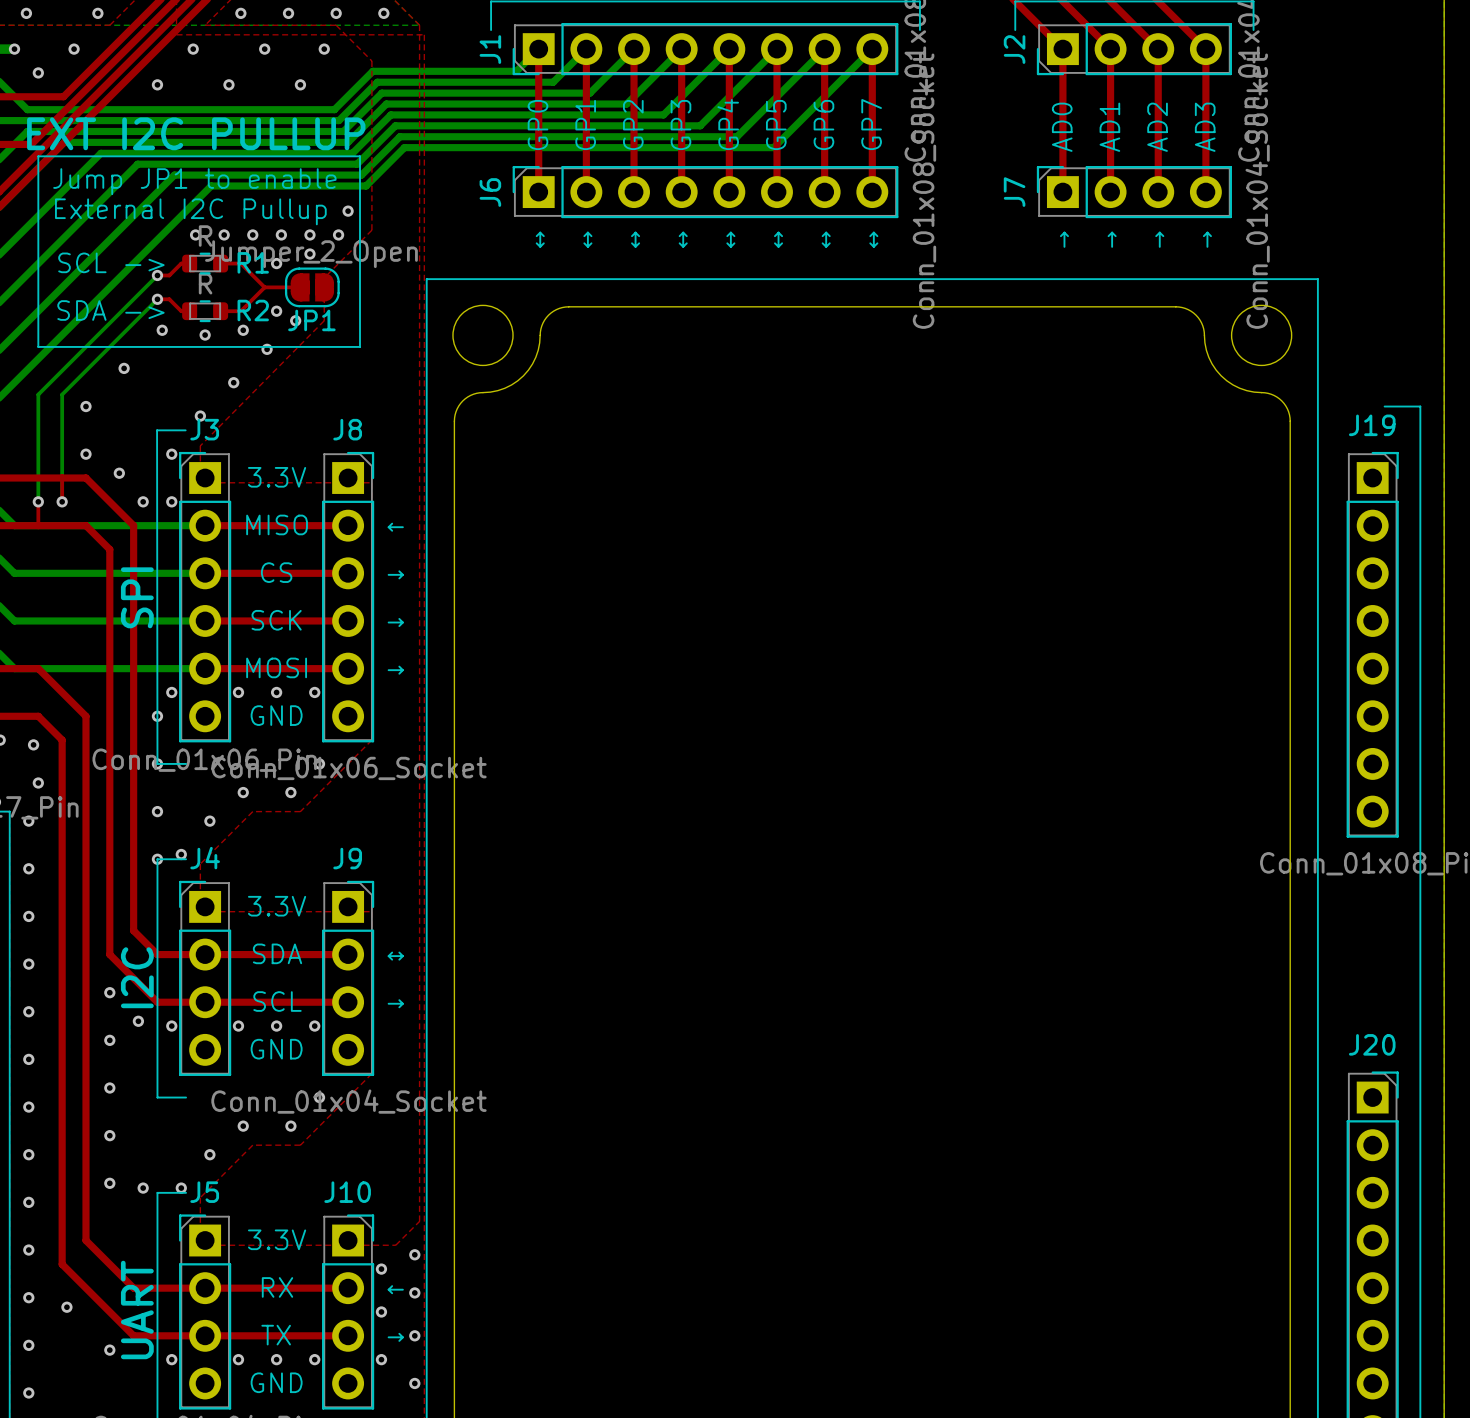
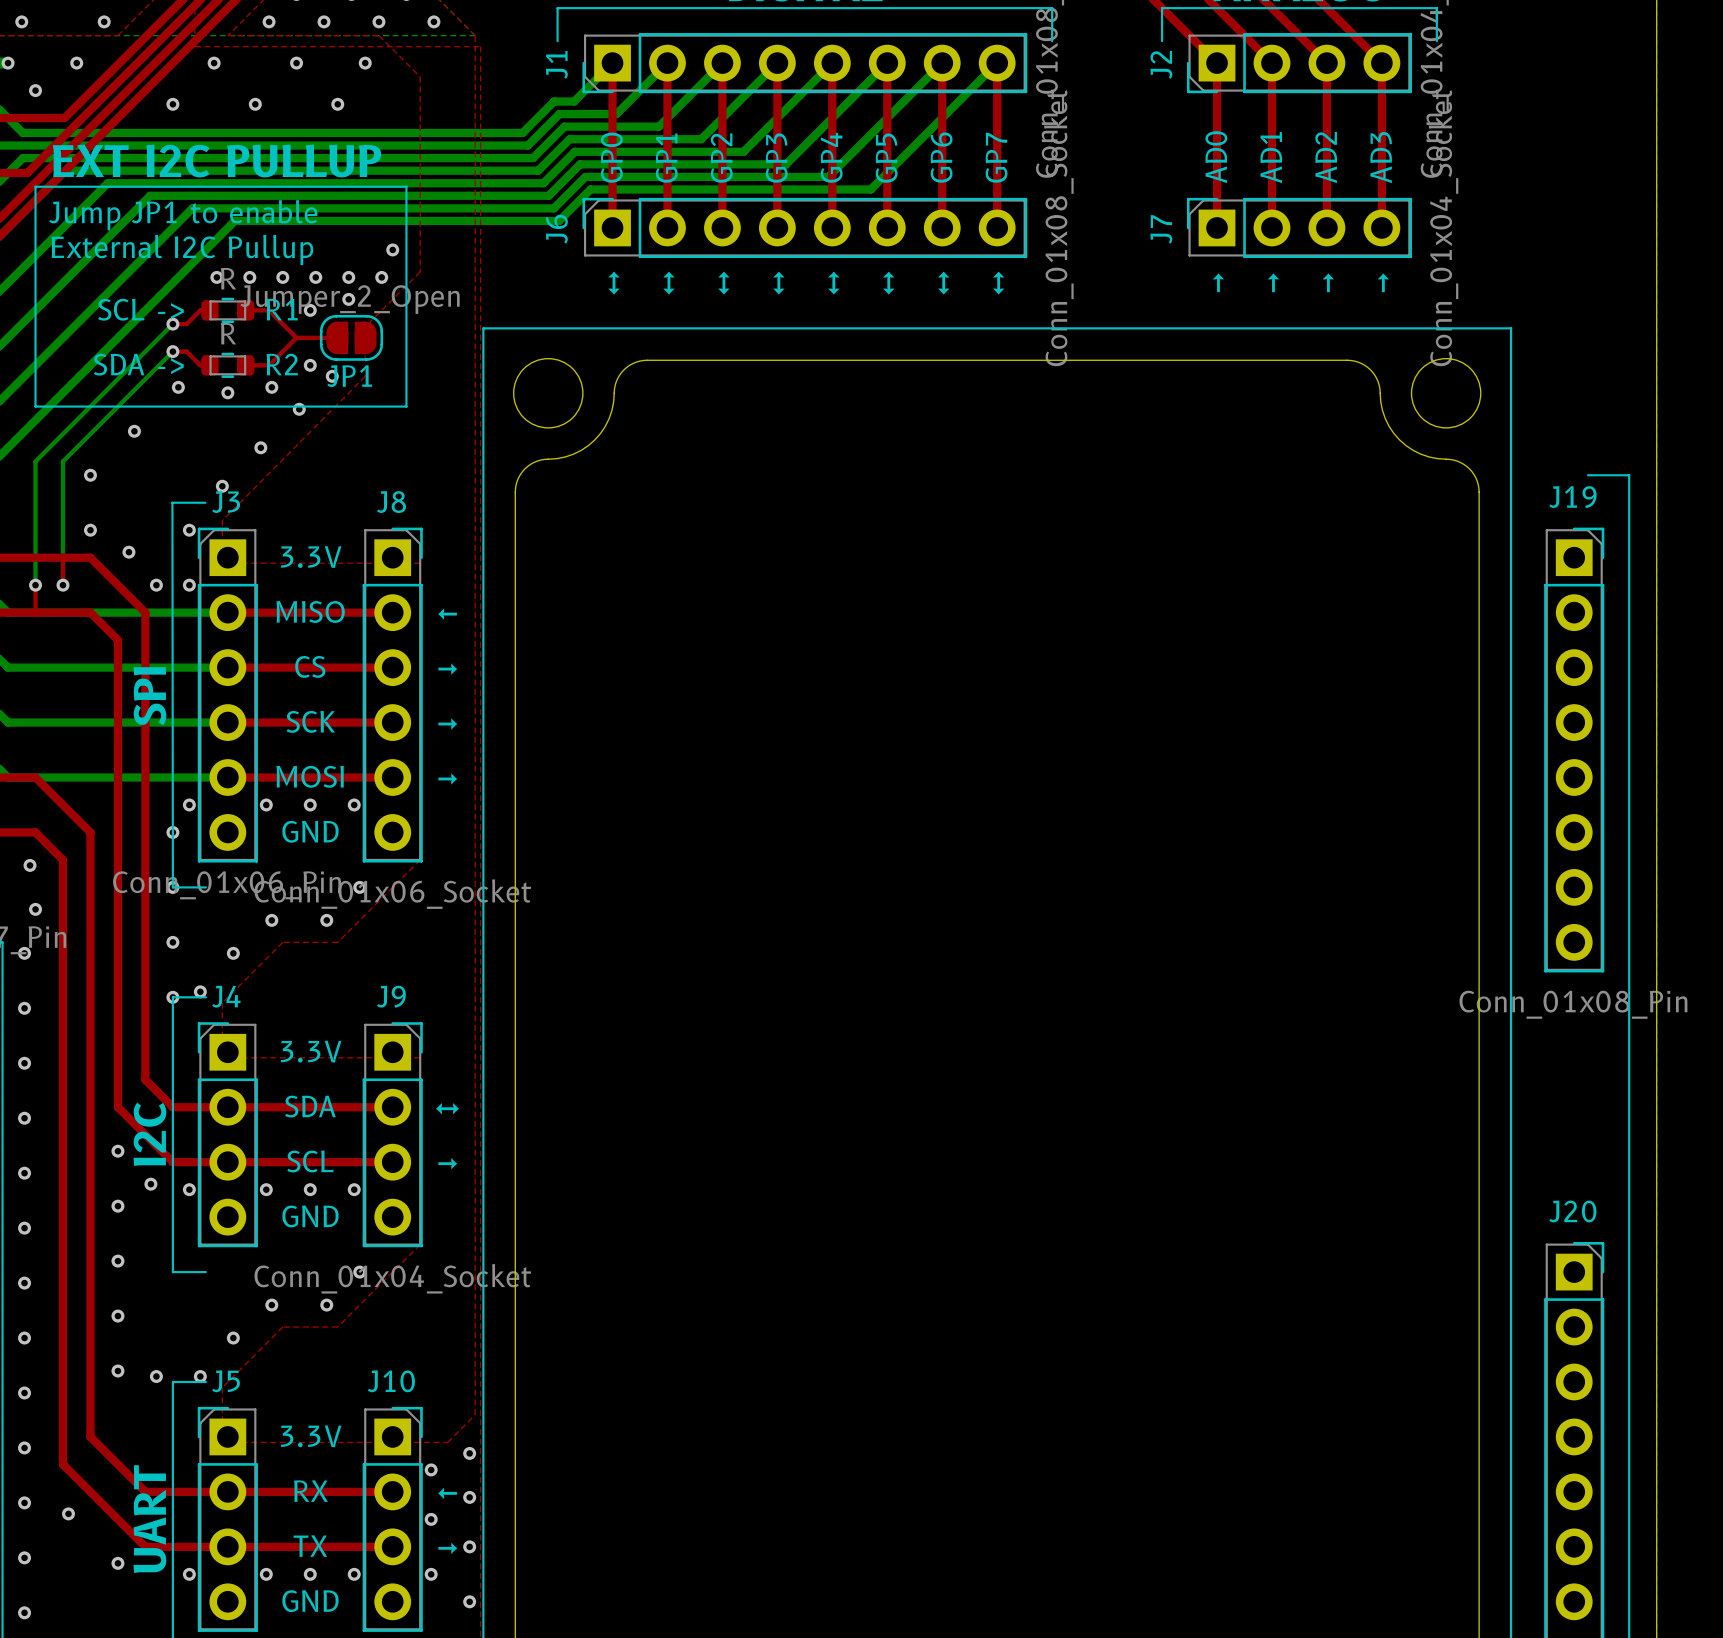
bottom track: (516, 71) (372, 71) (334, 109) -> (586, 88) (574, 101) (554, 101) (522, 132) (377, 132)
bottom track: (553, 82) (377, 82) (338, 120) -> (629, 101) (616, 114) (559, 114) (527, 145) (382, 145)
bottom track: (590, 93) (381, 93) (343, 131) -> (671, 113) (658, 126) (564, 126) (533, 158) (387, 158)
bottom track: (626, 104) (386, 104) (348, 142) -> (714, 126) (701, 139) (569, 139) (538, 170) (392, 170)
bottom track: (663, 114) (390, 114) (352, 153) -> (756, 139) (743, 151) (574, 151) (543, 183) (397, 183)
bottom track: (700, 125) (395, 125) (357, 164) -> (798, 151) (786, 164) (580, 164) (548, 195) (403, 195)
bottom track: (737, 136) (399, 136) (361, 175) -> (841, 164) (828, 176) (585, 176) (553, 208) (408, 208)
bottom track: (773, 147) (404, 147) (366, 185) -> (883, 176) (870, 189) (590, 189) (559, 220) (413, 220)

